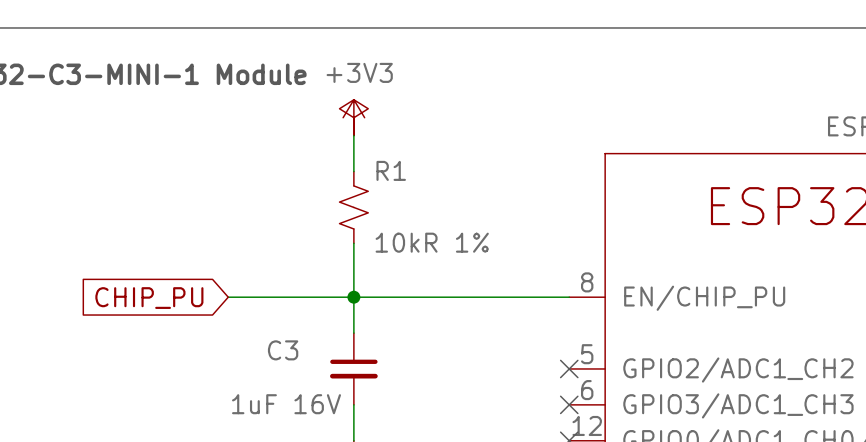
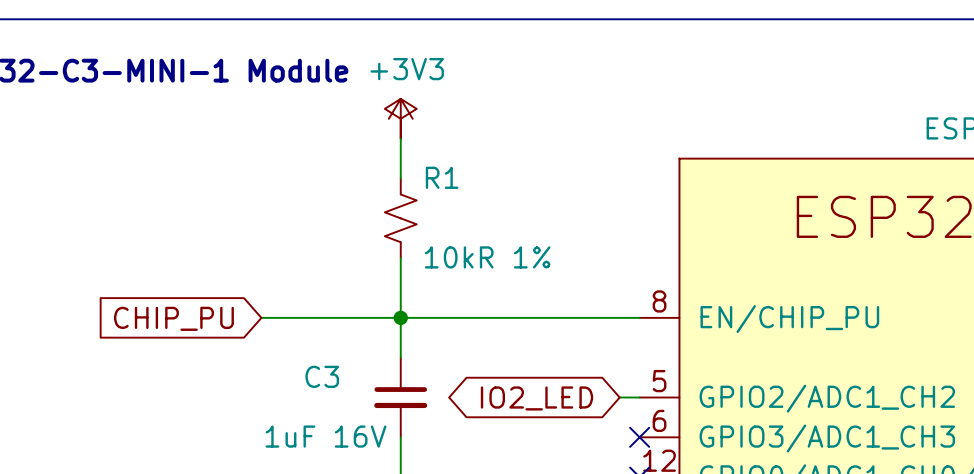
wire: none -> (619, 397) (639, 397)
no-connect mark: (569, 368) -> none
global label: none -> IO2_LED (537, 398)

